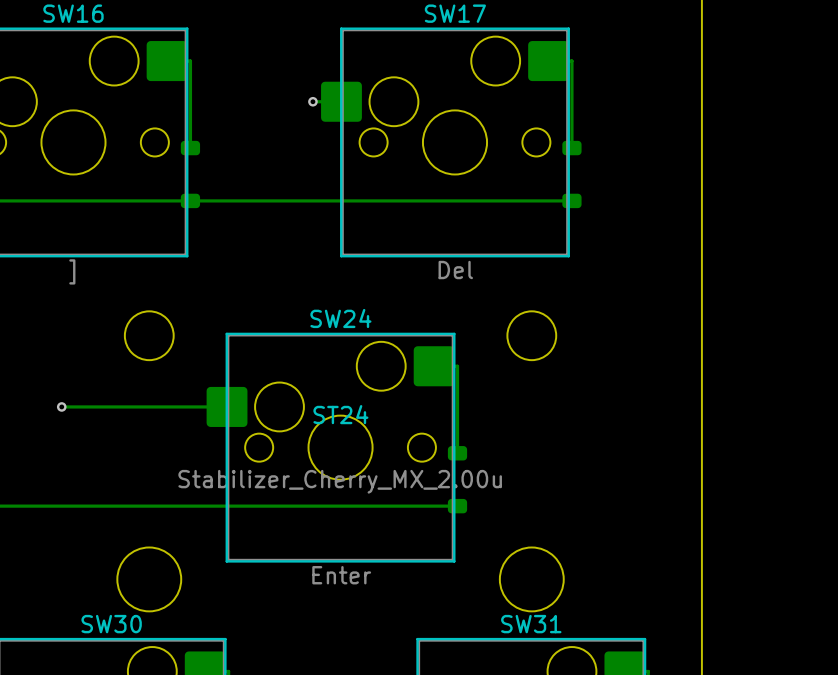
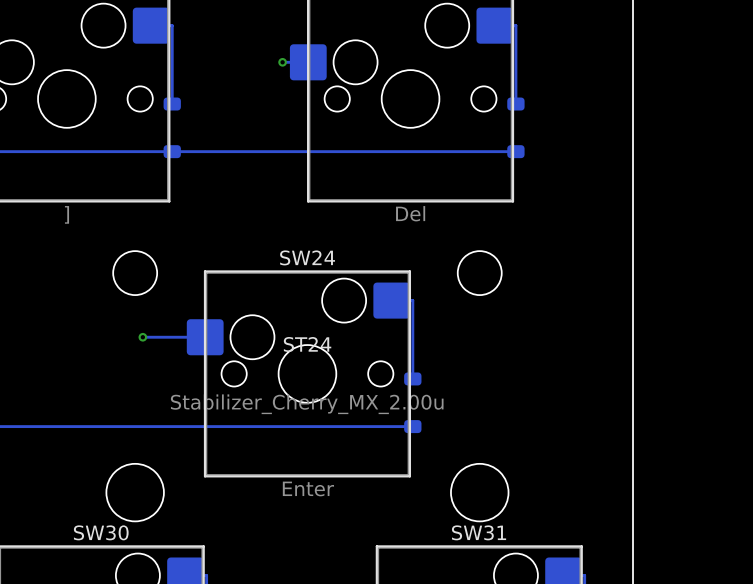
bottom track: (61, 406) (157, 406) -> none
via position: (61, 406) -> (142, 337)

